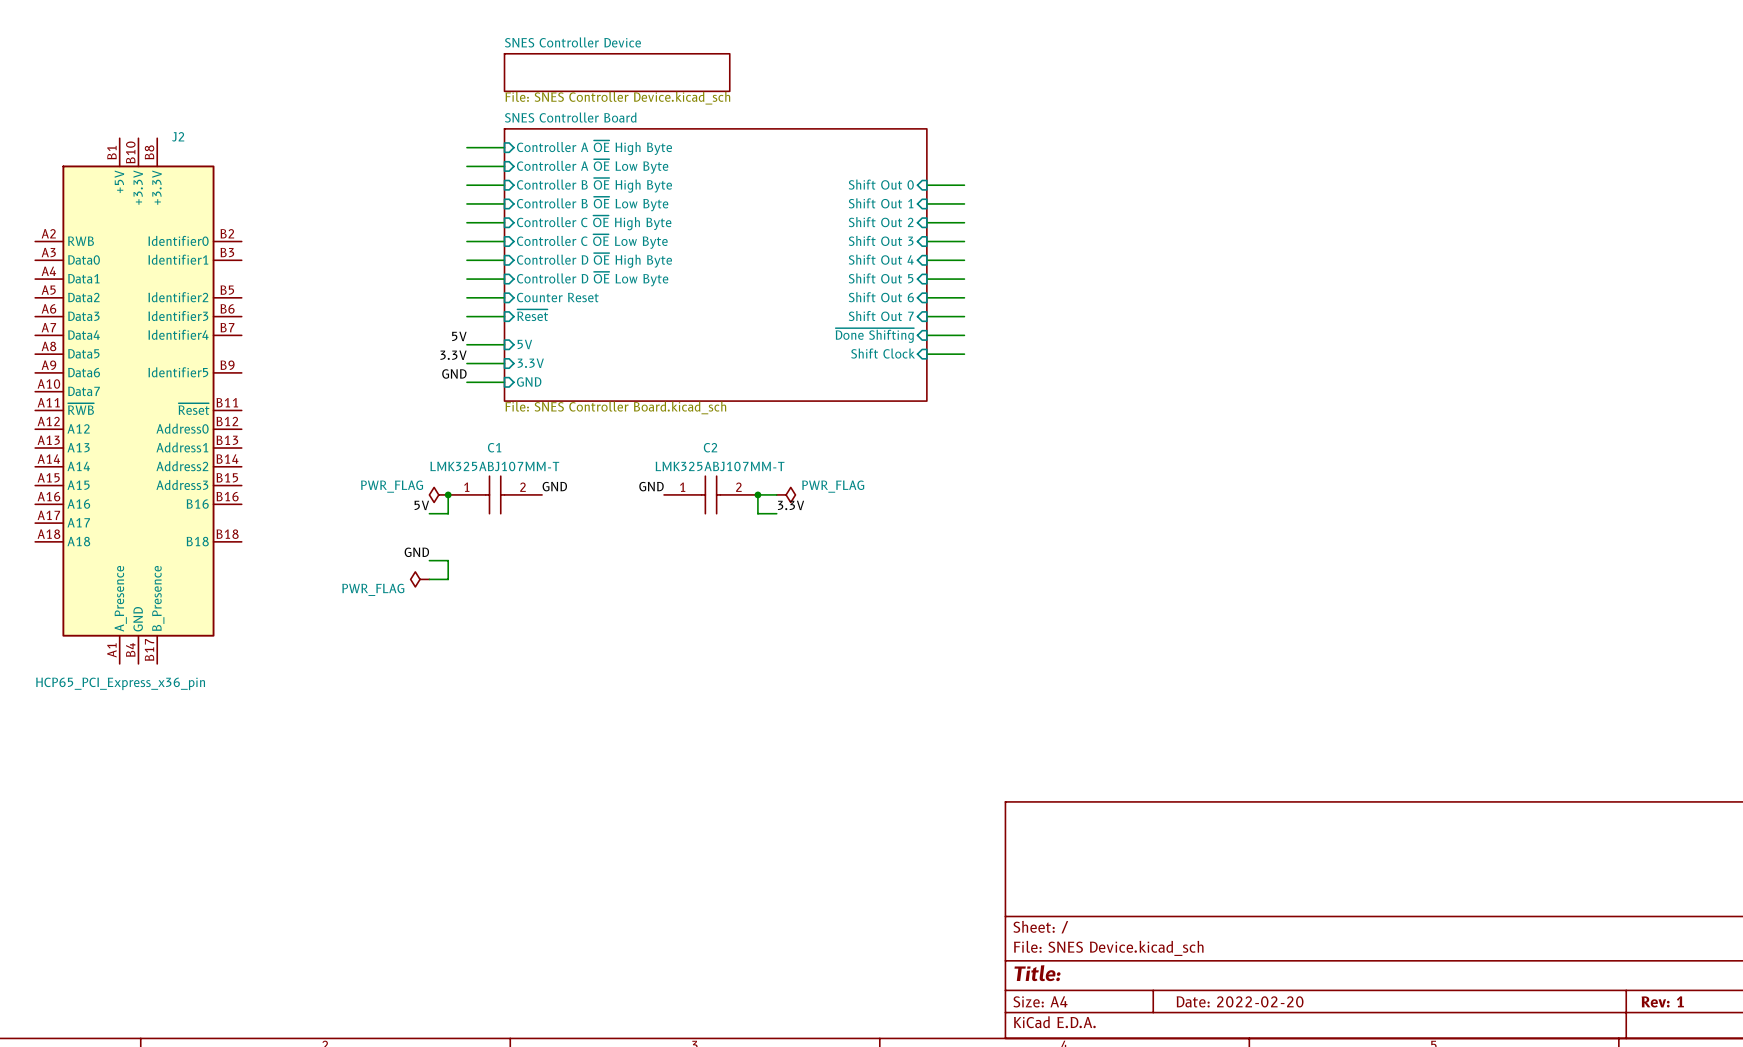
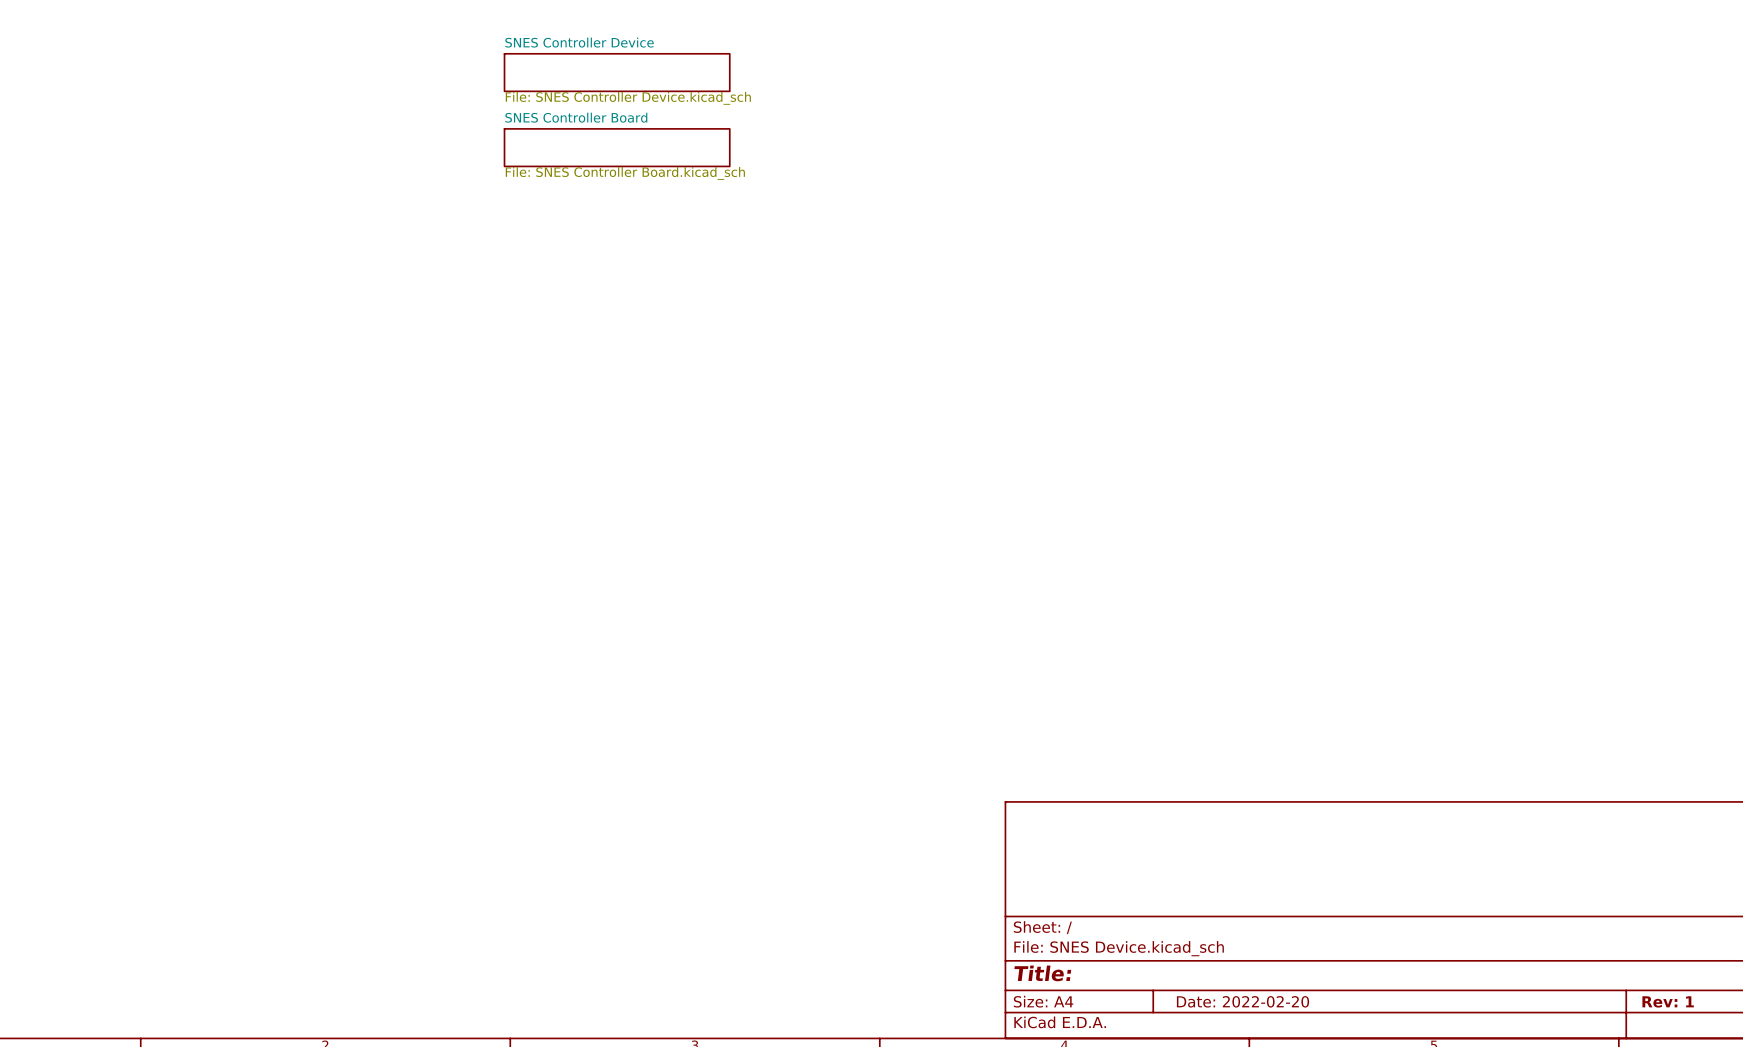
wire: (466, 147) (504, 147) -> none
sheet pin: Controller A ~{OE} High Byte (594, 147) -> none
sheet SNES Controller Board: none -> File: SNES Controller Board.kicad_sch (617, 147)
wire: (466, 166) (504, 166) -> none
sheet pin: Controller A ~{OE} Low Byte (592, 166) -> none
sheet pin: Shift Out 0 (881, 184) -> none
wire: (466, 185) (504, 185) -> none
sheet pin: Controller B ~{OE} High Byte (594, 185) -> none
wire: (926, 185) (964, 185) -> none
wire: (466, 203) (504, 203) -> none
sheet pin: Shift Out 1 (881, 203) -> none
wire: (926, 203) (964, 203) -> none
sheet pin: Controller B ~{OE} Low Byte (592, 204) -> none
wire: (466, 222) (504, 222) -> none
sheet pin: Controller C ~{OE} High Byte (594, 222) -> none
sheet pin: Shift Out 2 (881, 222) -> none
wire: (926, 222) (964, 222) -> none
sheet pin: Shift Out 3 (881, 240) -> none
wire: (466, 241) (504, 241) -> none
sheet pin: Controller C ~{OE} Low Byte (592, 241) -> none
wire: (926, 241) (964, 241) -> none
sheet pin: Shift Out 4 (881, 259) -> none
wire: (466, 260) (504, 260) -> none
sheet pin: Controller D ~{OE} High Byte (594, 260) -> none
wire: (926, 260) (964, 260) -> none
sheet SNES Controller Board: File: SNES Controller Board.kicad_sch (715, 264) -> none
sheet pin: Shift Out 5 (881, 278) -> none
wire: (466, 279) (504, 279) -> none
sheet pin: Controller D ~{OE} Low Byte (592, 279) -> none
wire: (926, 279) (964, 279) -> none
wire: (466, 297) (504, 297) -> none
sheet pin: Counter Reset (557, 297) -> none
sheet pin: Shift Out 6 (881, 297) -> none
wire: (926, 297) (964, 297) -> none
sheet pin: ~{Reset} (532, 315) -> none
sheet pin: Shift Out 7 (881, 315) -> none
wire: (466, 316) (504, 316) -> none
wire: (926, 316) (964, 316) -> none
sheet pin: ~{Done Shifting} (874, 335) -> none
wire: (926, 335) (964, 335) -> none
label: 5V (459, 336) -> none
wire: (466, 344) (504, 344) -> none
sheet pin: 5V (524, 344) -> none
sheet pin: Shift Clock (883, 353) -> none
wire: (926, 354) (964, 354) -> none
label: 3.3V (453, 355) -> none
wire: (466, 363) (504, 363) -> none
sheet pin: 3.3V (530, 363) -> none
label: GND (454, 373) -> none
wire: (466, 382) (504, 382) -> none
sheet pin: GND (529, 382) -> none
J2: HCP65_PCI_Express_x36_pin (138, 401) -> none
label: GND (554, 486) -> none
label: GND (651, 486) -> none
power symbol: PWR_FLAG (438, 494) -> none
wire: (448, 494) (448, 513) (429, 513) -> none
junction: (448, 494) -> none
C1: LMK325ABJ107MM-T (495, 494) -> none
C2: LMK325ABJ107MM-T (711, 494) -> none
junction: (757, 494) -> none
wire: (776, 494) (757, 494) (757, 513) (776, 513) -> none
power symbol: PWR_FLAG (786, 494) -> none
label: 5V (421, 505) -> none
label: 3.3V (791, 505) -> none
label: GND (416, 552) -> none
wire: (429, 560) (448, 560) (448, 579) (429, 579) -> none
power symbol: PWR_FLAG (420, 579) -> none

